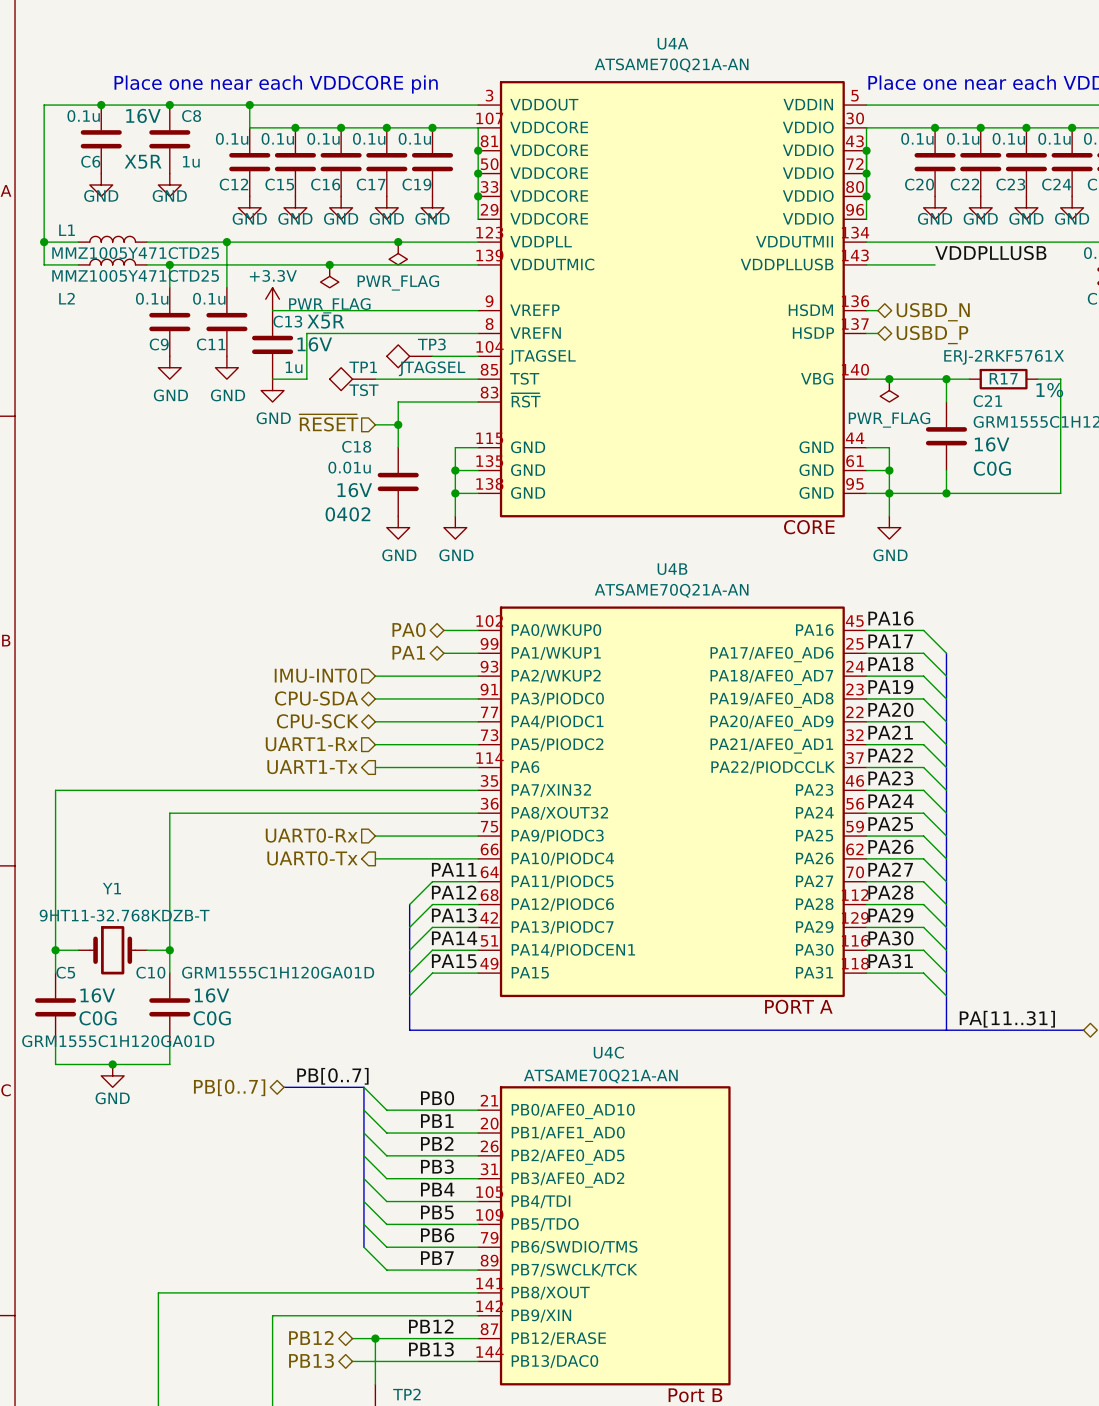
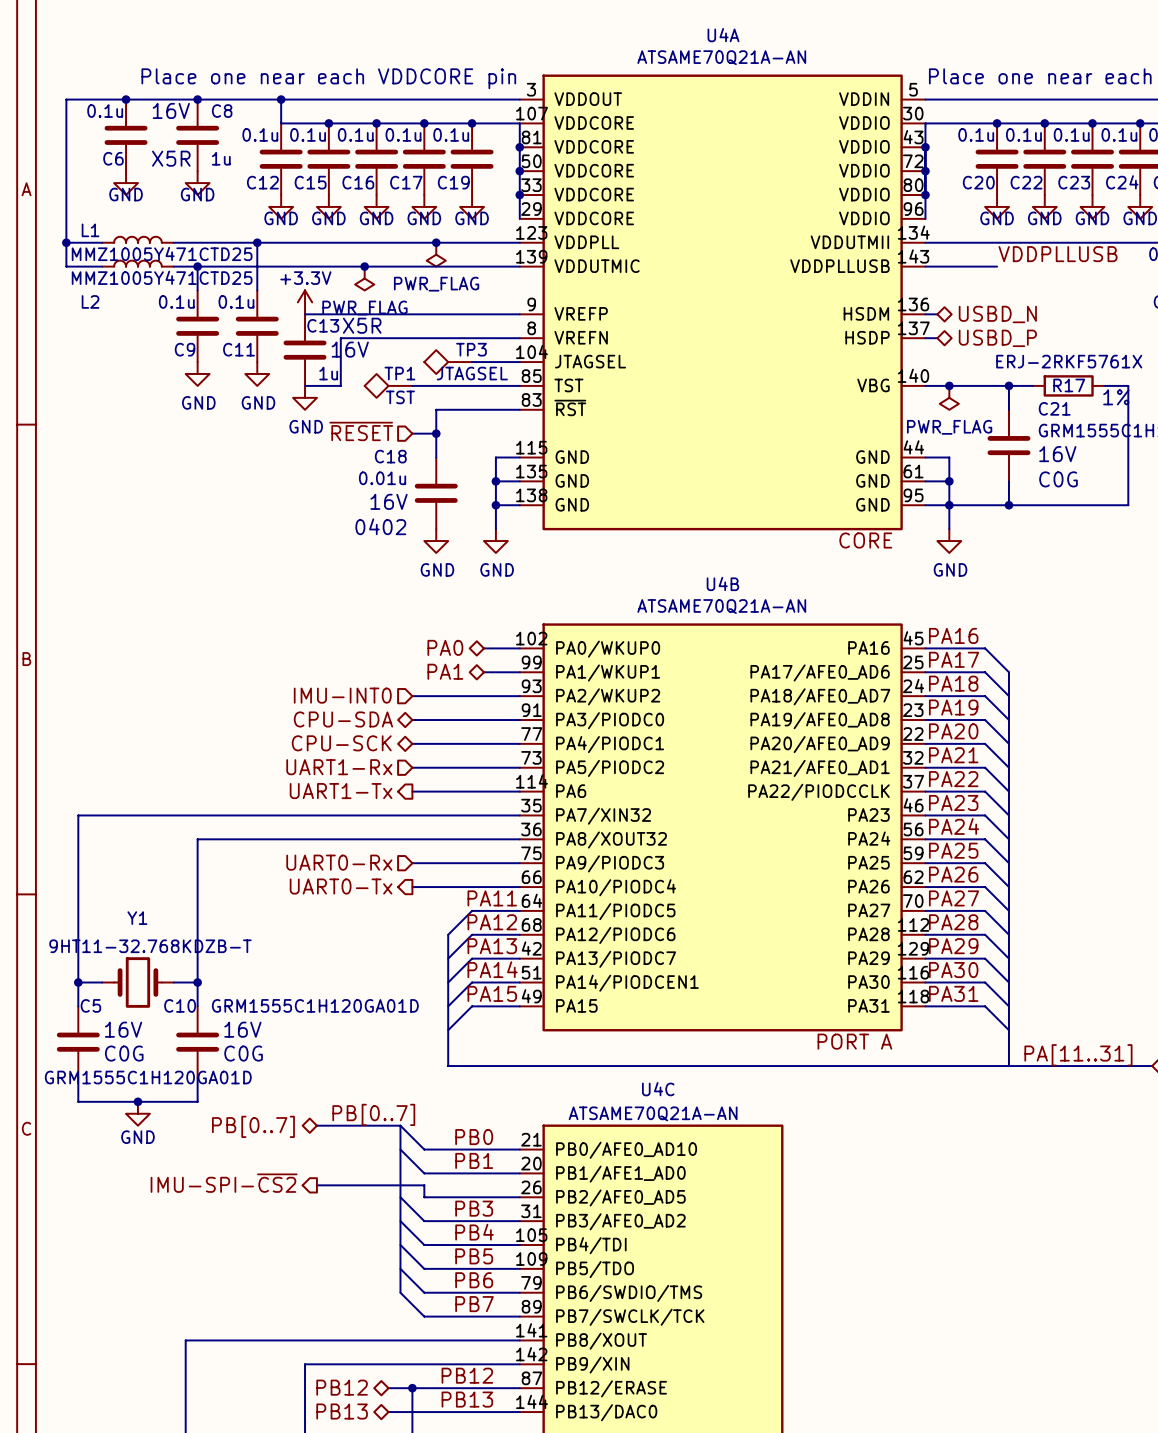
wire: (363, 1133) (386, 1155) -> (316, 1185) (424, 1185) (424, 1197)
hierarchical label: none -> IMU-SPI-~{CS2} (224, 1183)
label: PB2 (437, 1143) -> none

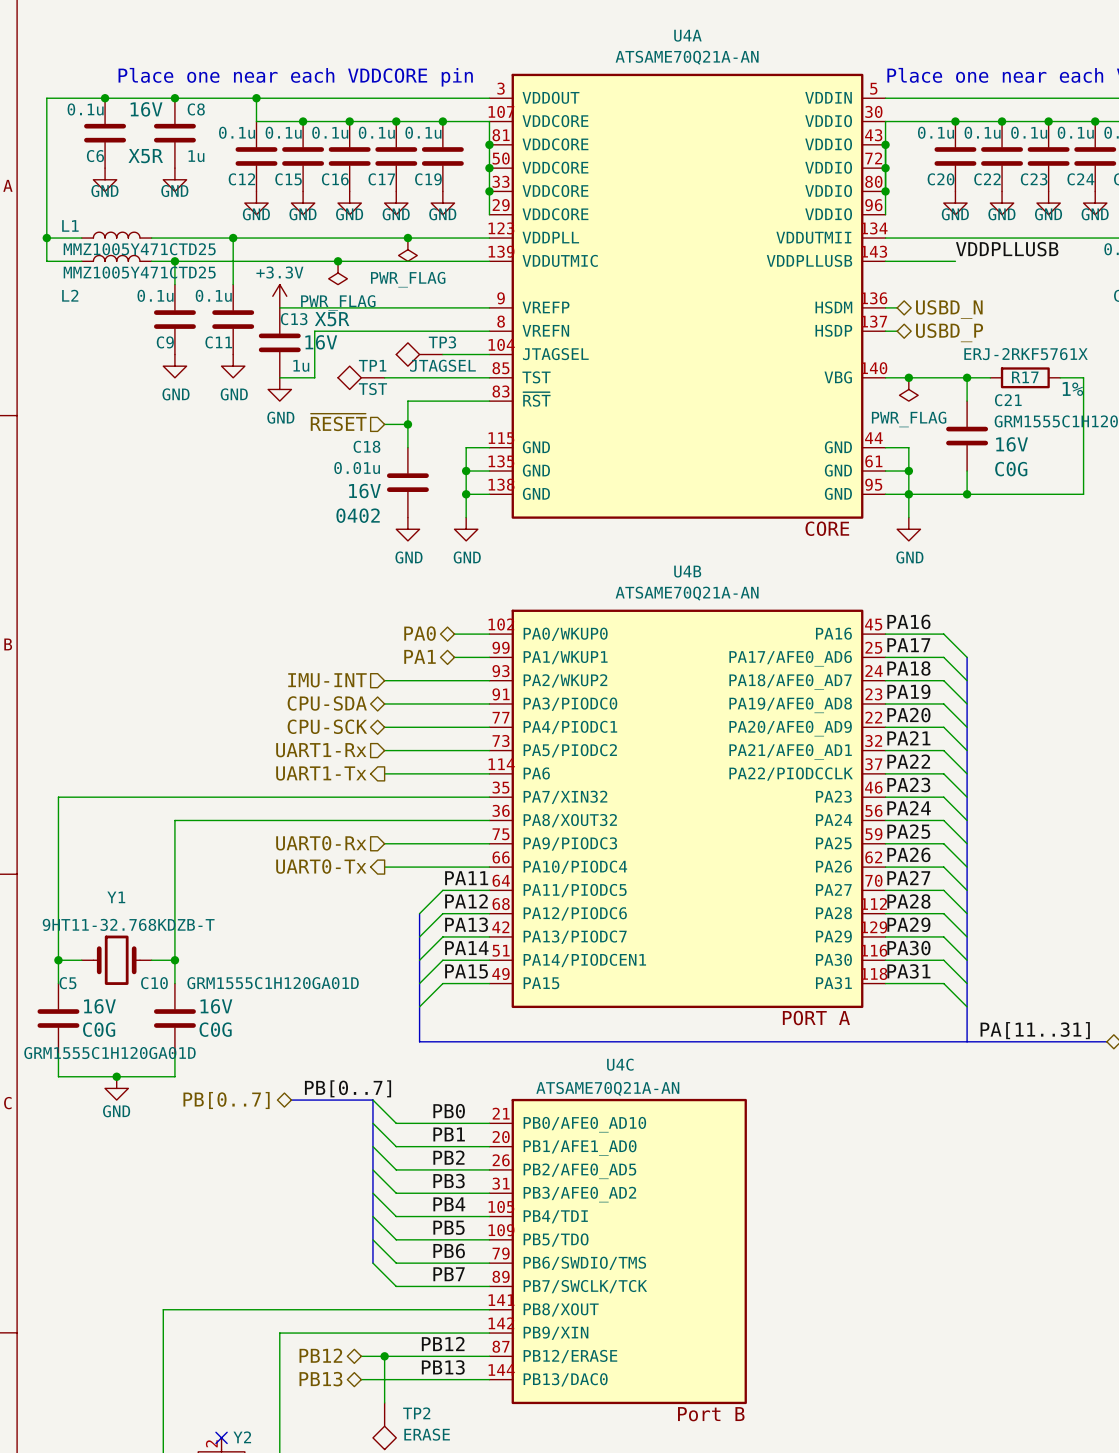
hierarchical label: IMU-INT0 (342, 695) -> IMU-INT (327, 680)
hierarchical label: IMU-SPI-~{CS2} (224, 1183) -> none
label: none -> PB2 (448, 1157)
wire: (316, 1185) (424, 1185) (424, 1197) -> (372, 1146) (396, 1169)

